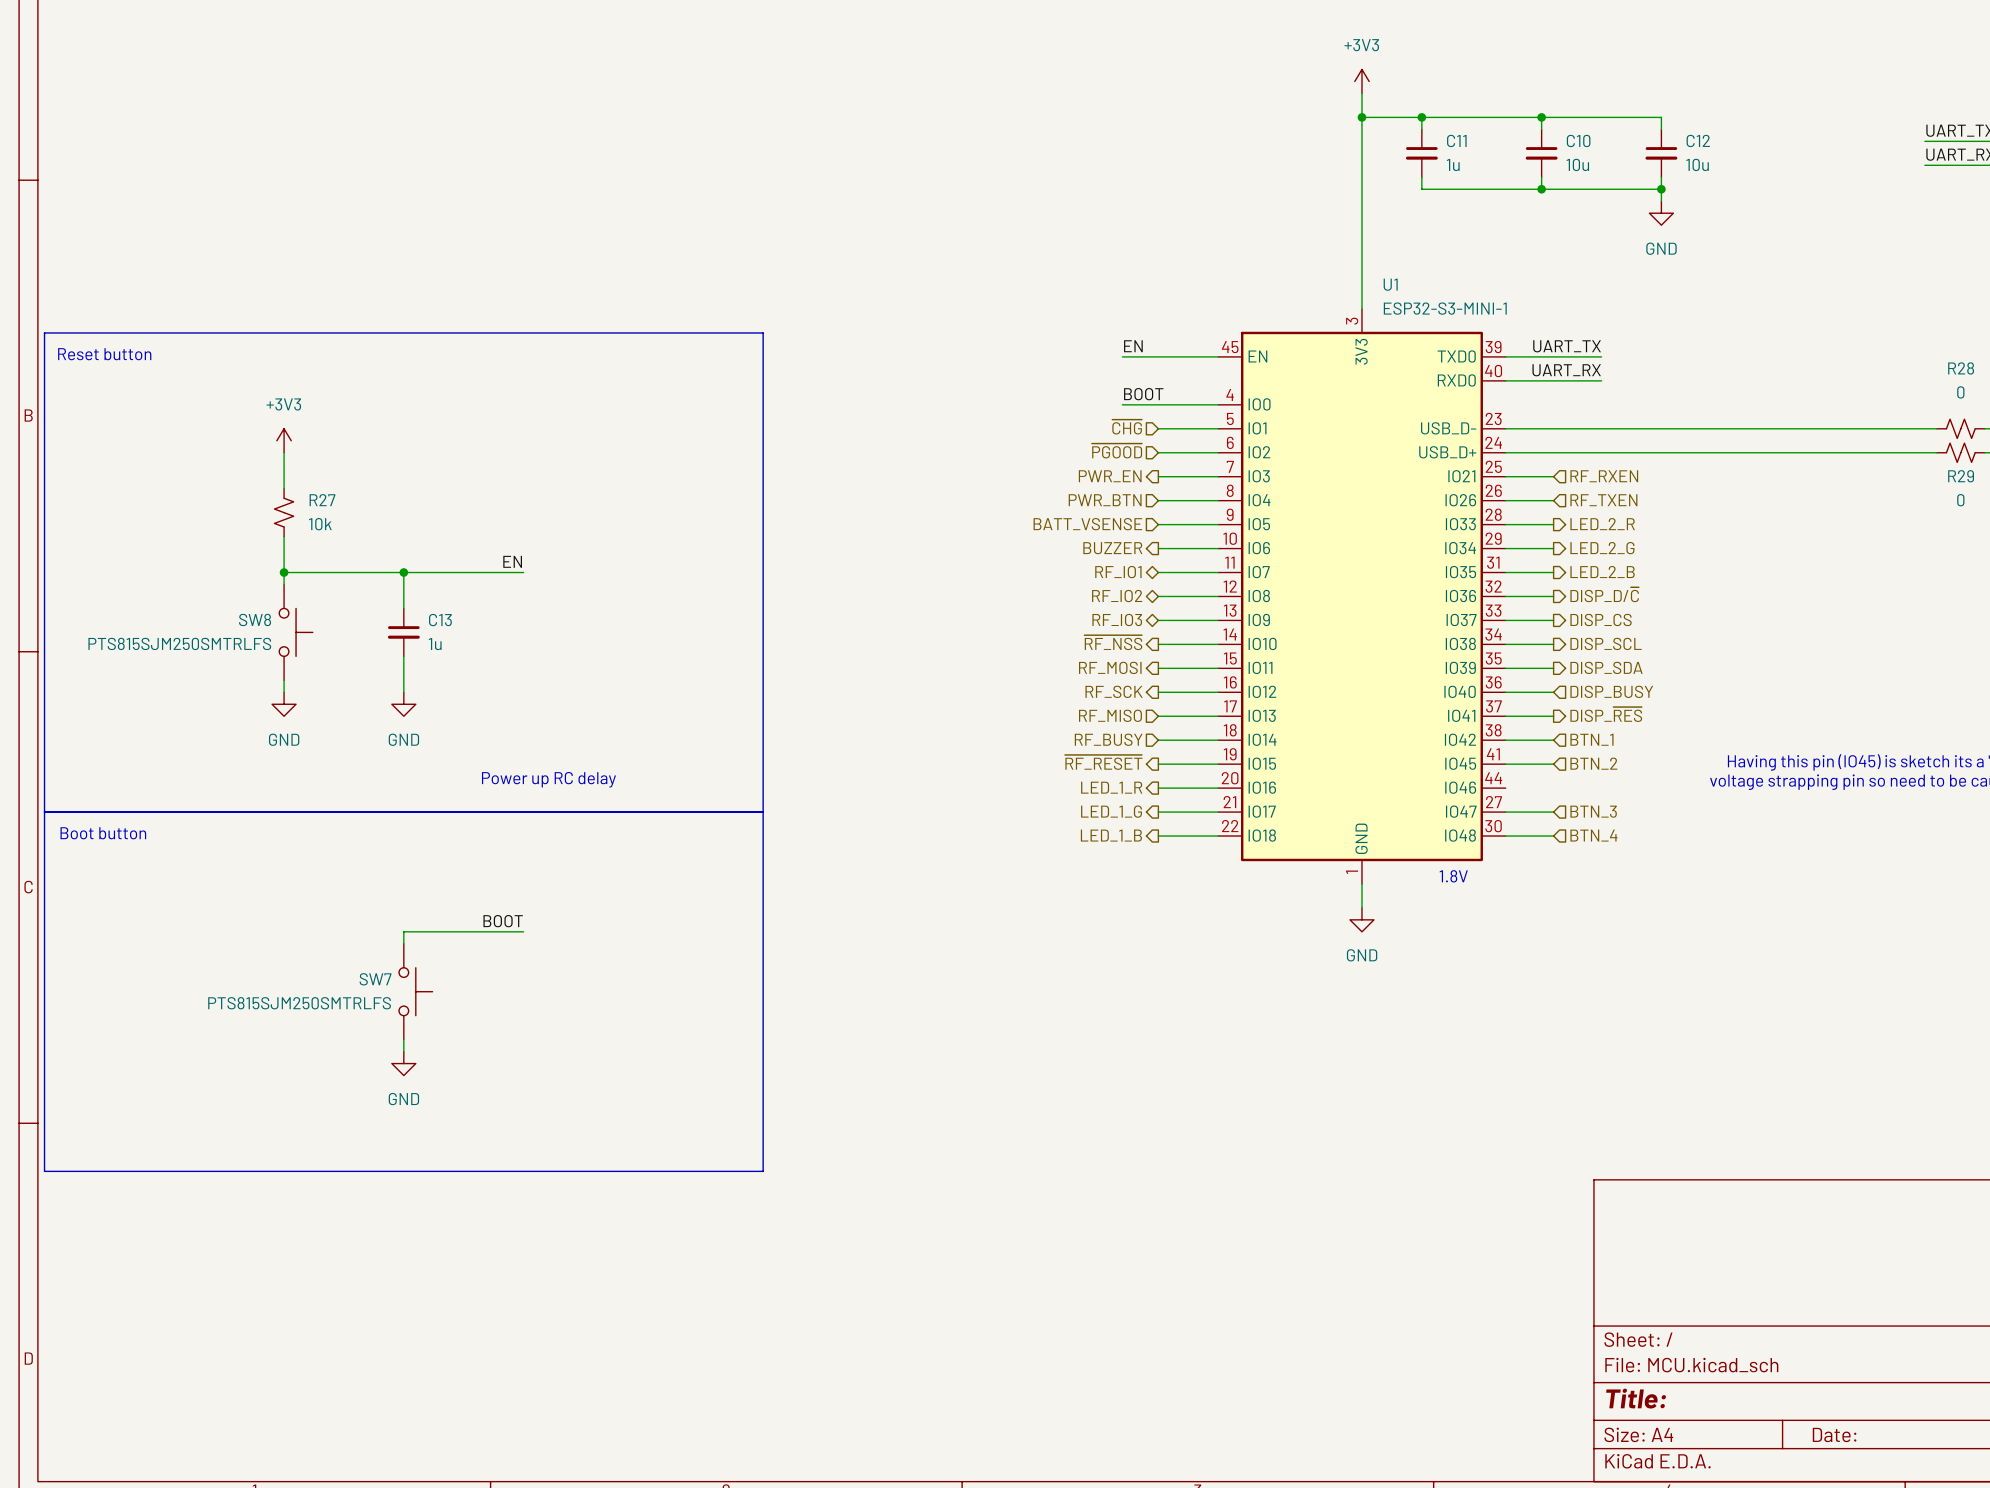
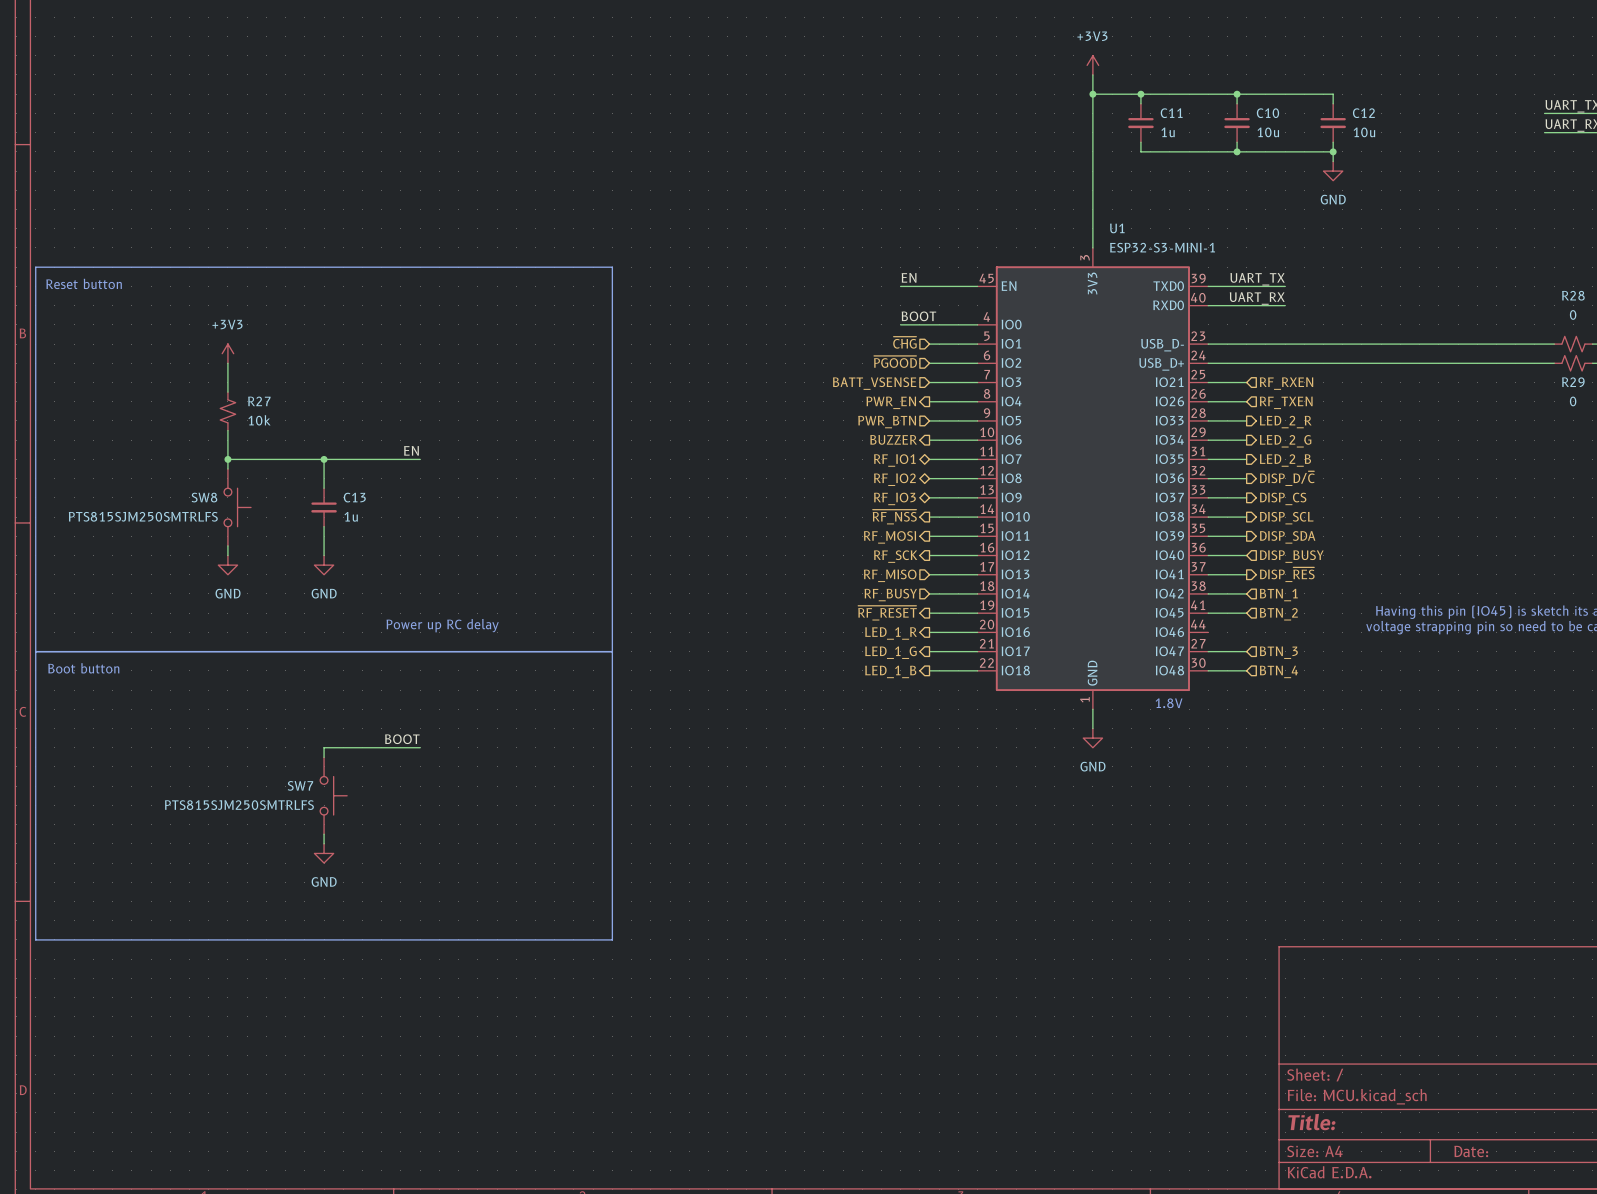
hierarchical label shape: output (1110, 476) -> input (874, 383)
hierarchical label: PWR_EN (1110, 476) -> BATT_VSENSE (874, 383)
hierarchical label shape: input (1105, 500) -> output (891, 402)
hierarchical label: PWR_BTN (1105, 500) -> PWR_EN (891, 402)
hierarchical label: BATT_VSENSE (1087, 524) -> PWR_BTN (887, 422)

